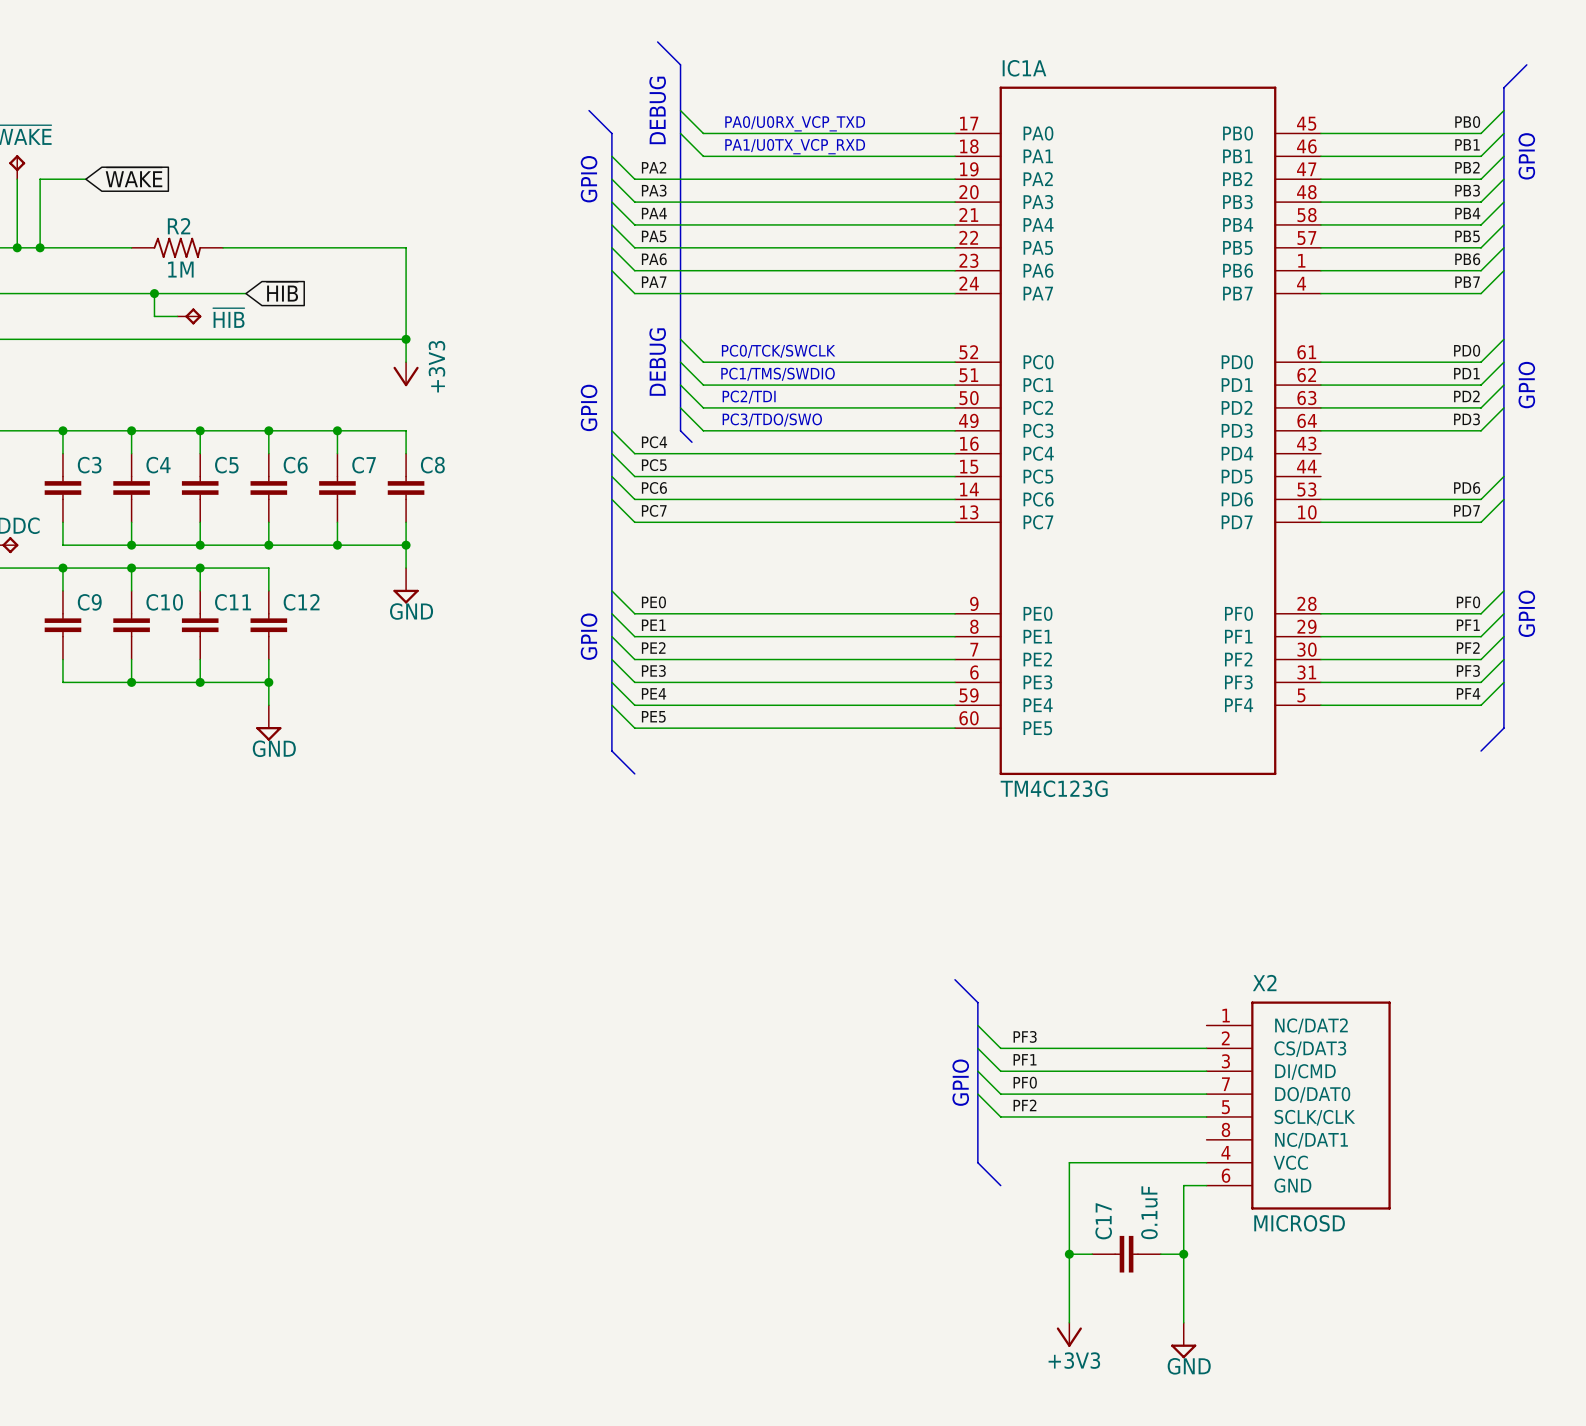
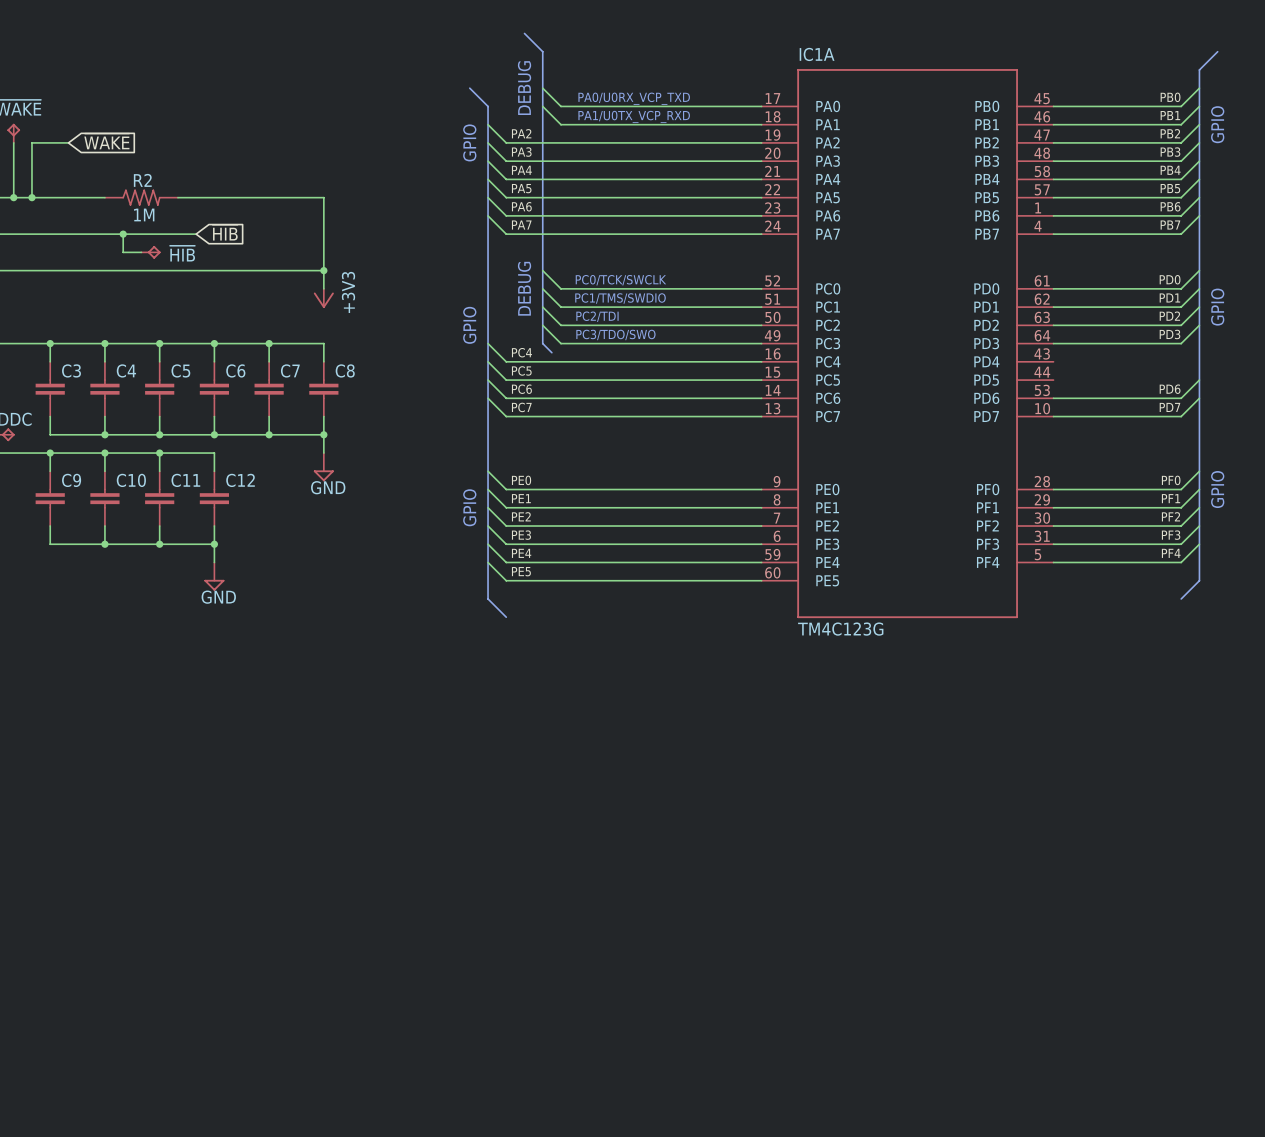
bus: (955, 979) (977, 1002) (977, 1162) (1000, 1185) -> none
wire: (977, 1025) (1000, 1048) (1206, 1048) -> none
label: PF3 (1025, 1036) -> none
wire: (977, 1048) (1000, 1071) (1206, 1071) -> none
label: PF1 (1025, 1059) -> none
wire: (977, 1071) (1000, 1094) (1206, 1094) -> none
text: GPIO (960, 1082) -> none
label: PF0 (1025, 1082) -> none
wire: (977, 1094) (1000, 1116) (1206, 1116) -> none
label: PF2 (1024, 1105) -> none
X2: MICROSD (1298, 1105) -> none
wire: (1206, 1162) (1069, 1162) (1069, 1322) -> none
wire: (1206, 1185) (1183, 1185) (1183, 1322) -> none
wire: (1069, 1254) (1092, 1254) -> none
junction: (1069, 1254) -> none
C17: 0.1uF (1126, 1254) -> none
wire: (1160, 1254) (1183, 1254) -> none
junction: (1183, 1254) -> none
power symbol: +3V3 (1069, 1334) -> none
power symbol: GND (1183, 1340) -> none

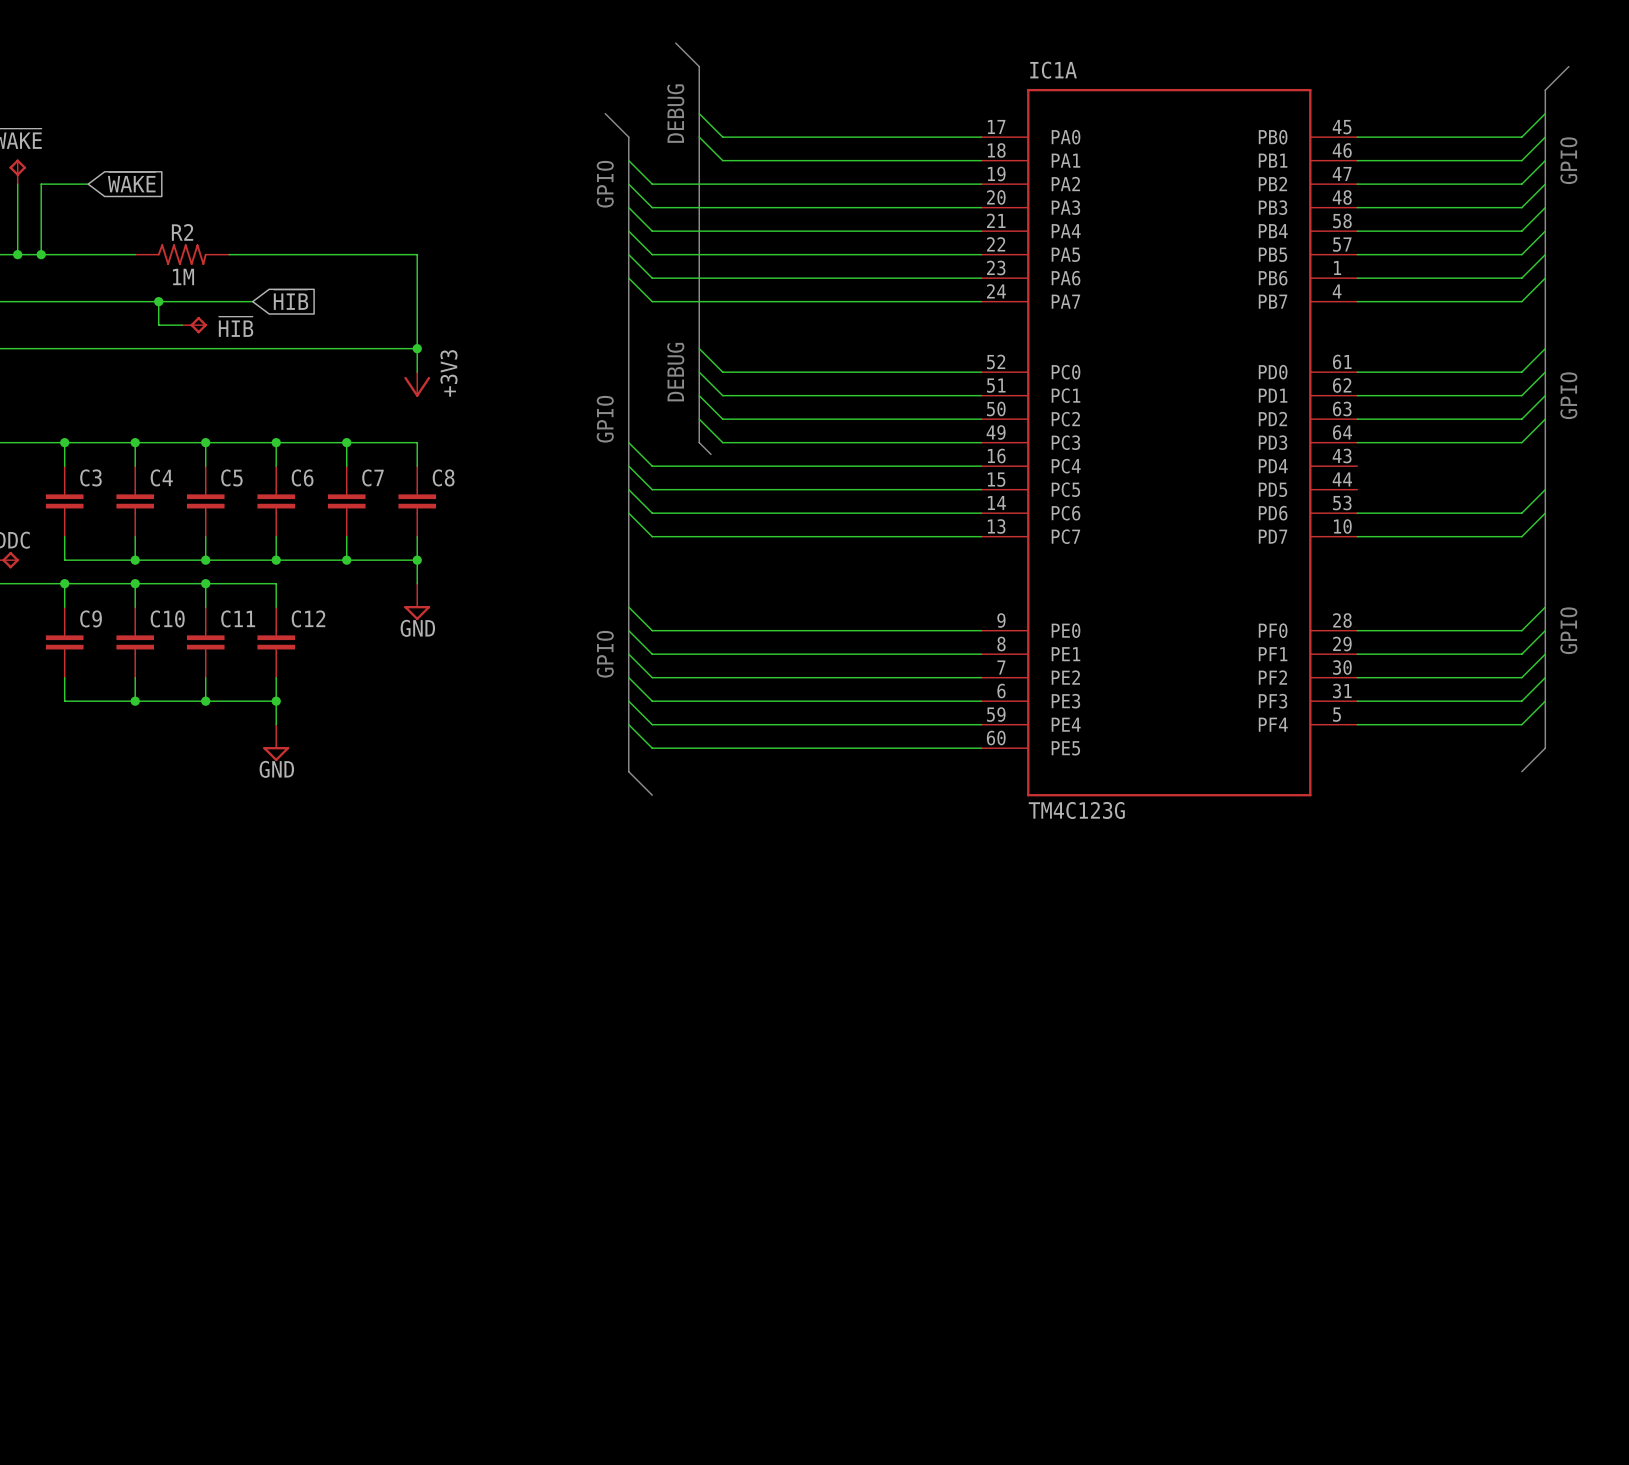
label: PB0 (1170, 97) -> none
text: PA0/U0RX_VCP_TXD (634, 98) -> none
label: PB1 (1170, 115) -> none
text: PA1/U0TX_VCP_RXD (634, 116) -> none
label: PA2 (521, 133) -> none
label: PB2 (1170, 133) -> none
label: PA3 (521, 152) -> none
label: PB3 (1170, 152) -> none
label: PA4 (521, 170) -> none
label: PB4 (1170, 170) -> none
label: PA5 (521, 188) -> none
label: PB5 (1170, 188) -> none
label: PA6 (521, 206) -> none
label: PB6 (1170, 206) -> none
label: PA7 (521, 225) -> none
label: PB7 (1170, 225) -> none
label: PD0 (1170, 279) -> none
text: PC0/TCK/SWCLK (620, 280) -> none
label: PD1 (1169, 297) -> none
text: PC1/TMS/SWDIO (620, 298) -> none
text: PC2/TDI (597, 316) -> none
label: PD2 (1169, 316) -> none
text: PC3/TDO/SWO (615, 334) -> none
label: PD3 (1170, 334) -> none
label: PC4 (521, 352) -> none
label: PC5 (521, 370) -> none
label: PC6 (521, 389) -> none
label: PD6 (1170, 389) -> none
label: PC7 (521, 407) -> none
label: PD7 (1169, 407) -> none
label: PE0 (521, 480) -> none
label: PF0 (1171, 480) -> none
label: PE1 (521, 498) -> none
label: PF1 (1171, 498) -> none
label: PE2 (521, 516) -> none
label: PF2 (1170, 516) -> none
label: PE3 (521, 535) -> none
label: PF3 (1171, 535) -> none
label: PE4 (521, 553) -> none
label: PF4 (1171, 553) -> none
label: PE5 (521, 571) -> none

